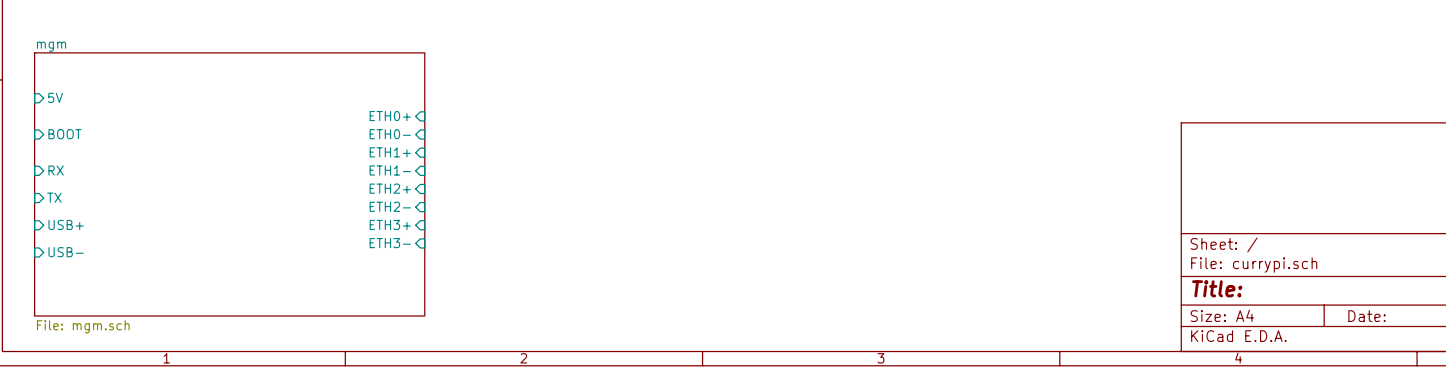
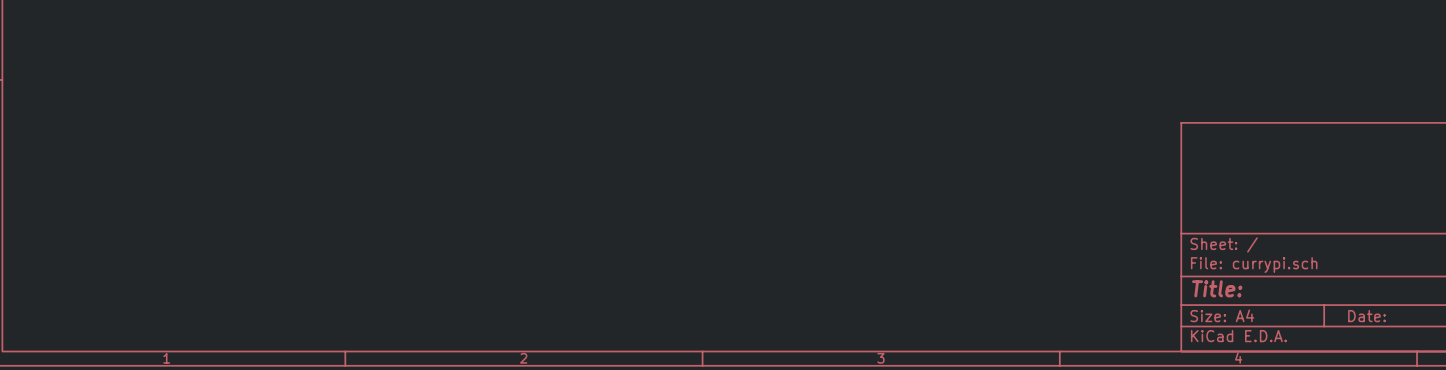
sheet pin: 5V (55, 97) -> none
sheet pin: ETH0+ (390, 116) -> none
sheet pin: BOOT (64, 134) -> none
sheet pin: ETH0- (390, 134) -> none
sheet pin: ETH1+ (390, 152) -> none
sheet pin: RX (56, 170) -> none
sheet pin: ETH1- (390, 170) -> none
sheet mgm: File: mgm.sch (229, 184) -> none
sheet pin: ETH2+ (390, 188) -> none
sheet pin: TX (54, 197) -> none
sheet pin: ETH2- (390, 206) -> none
sheet pin: USB+ (66, 224) -> none
sheet pin: ETH3+ (390, 224) -> none
sheet pin: ETH3- (390, 243) -> none
sheet pin: USB- (66, 252) -> none

